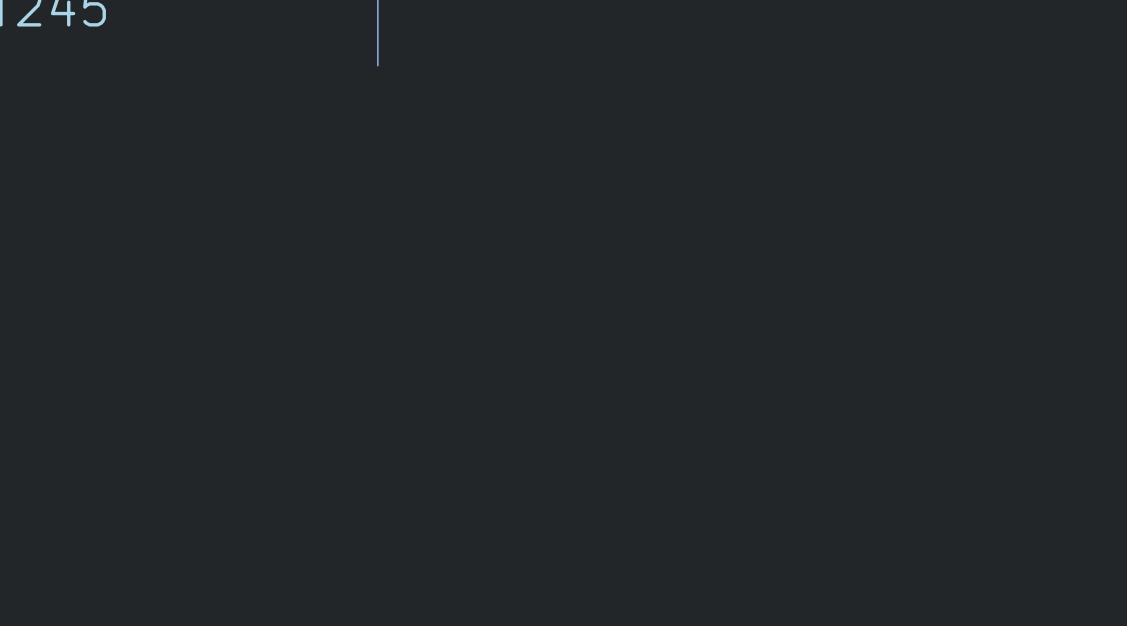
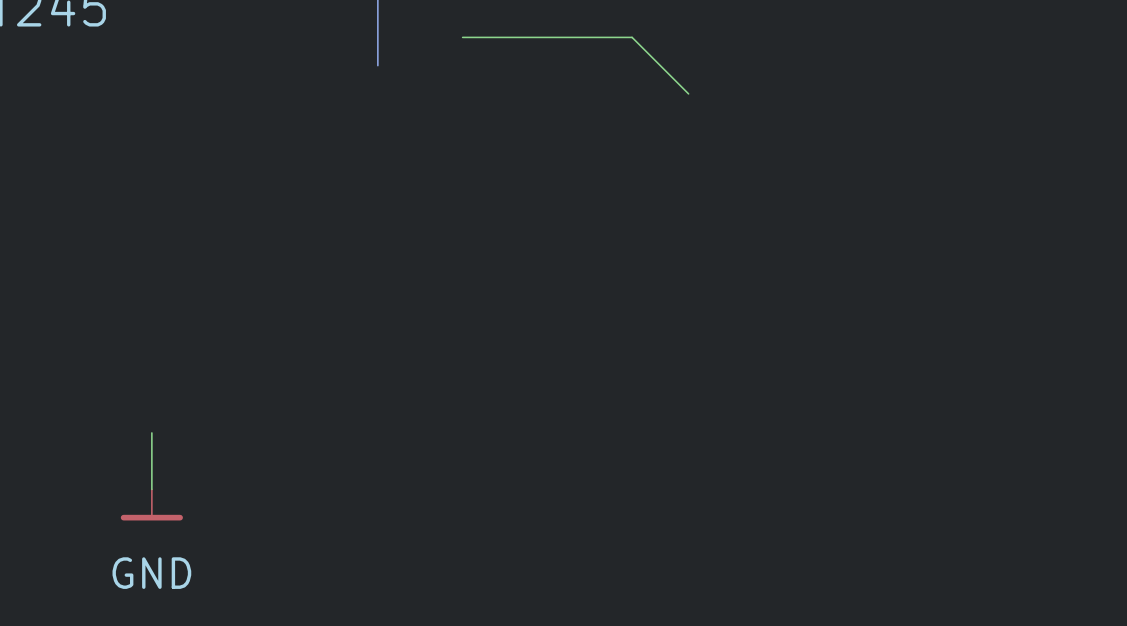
wire: none -> (462, 37) (632, 37) (688, 93)
wire: none -> (151, 432) (151, 489)
power symbol: none -> GND (151, 504)

